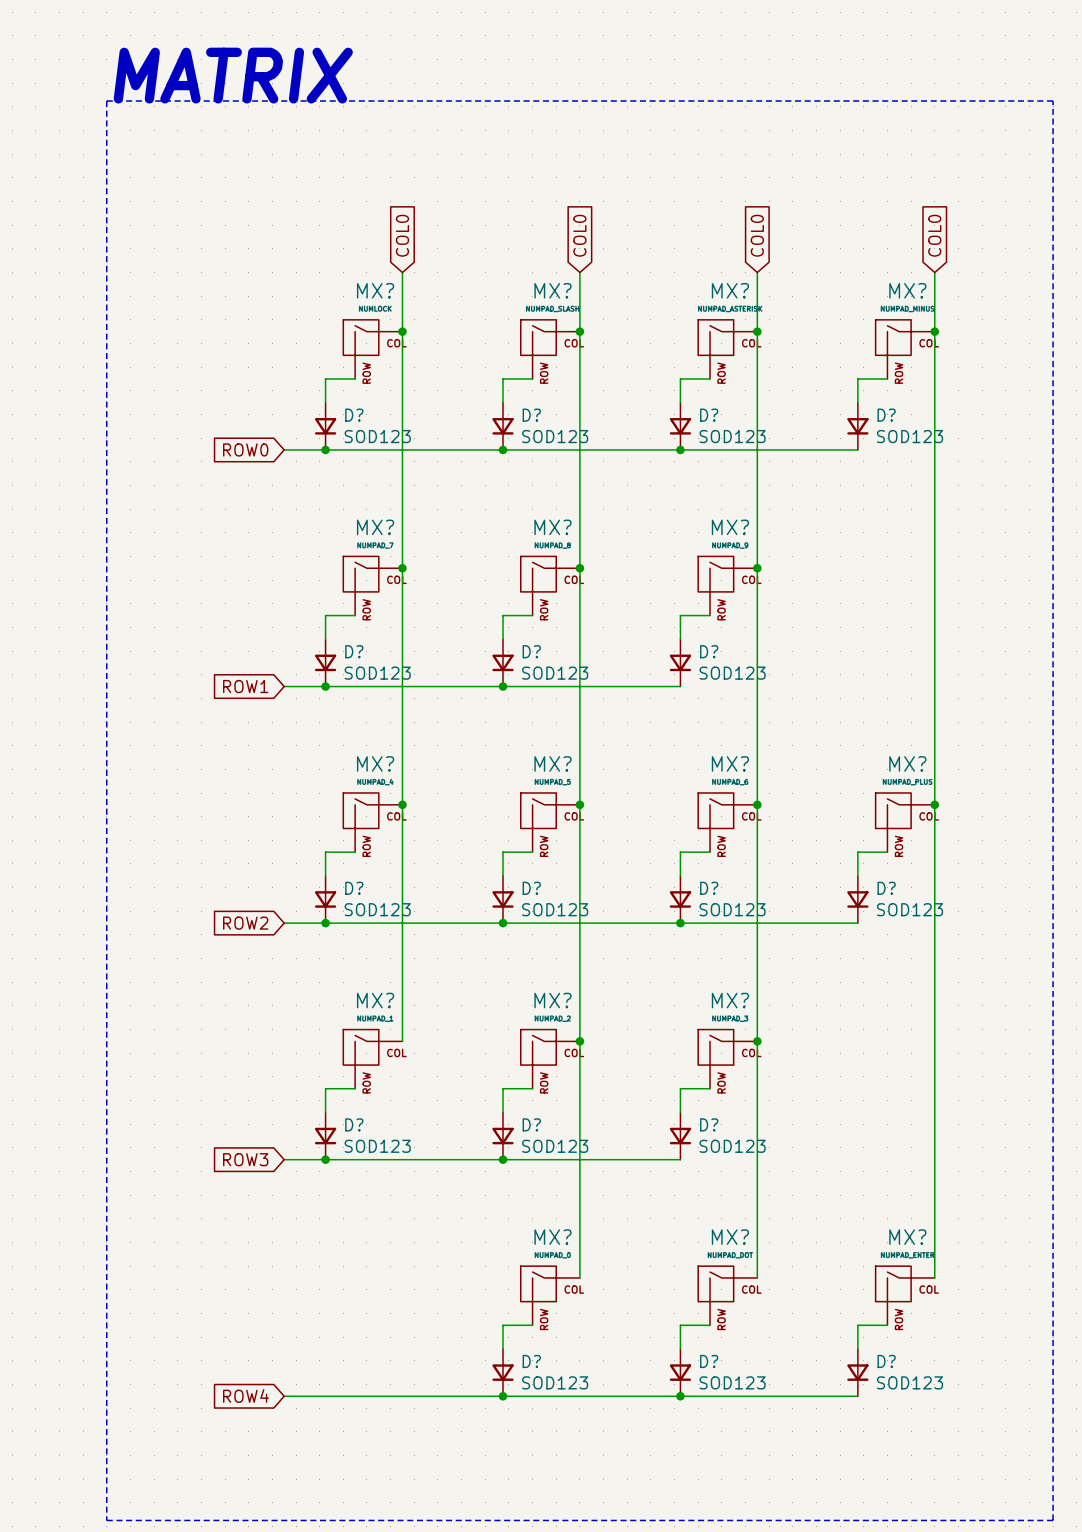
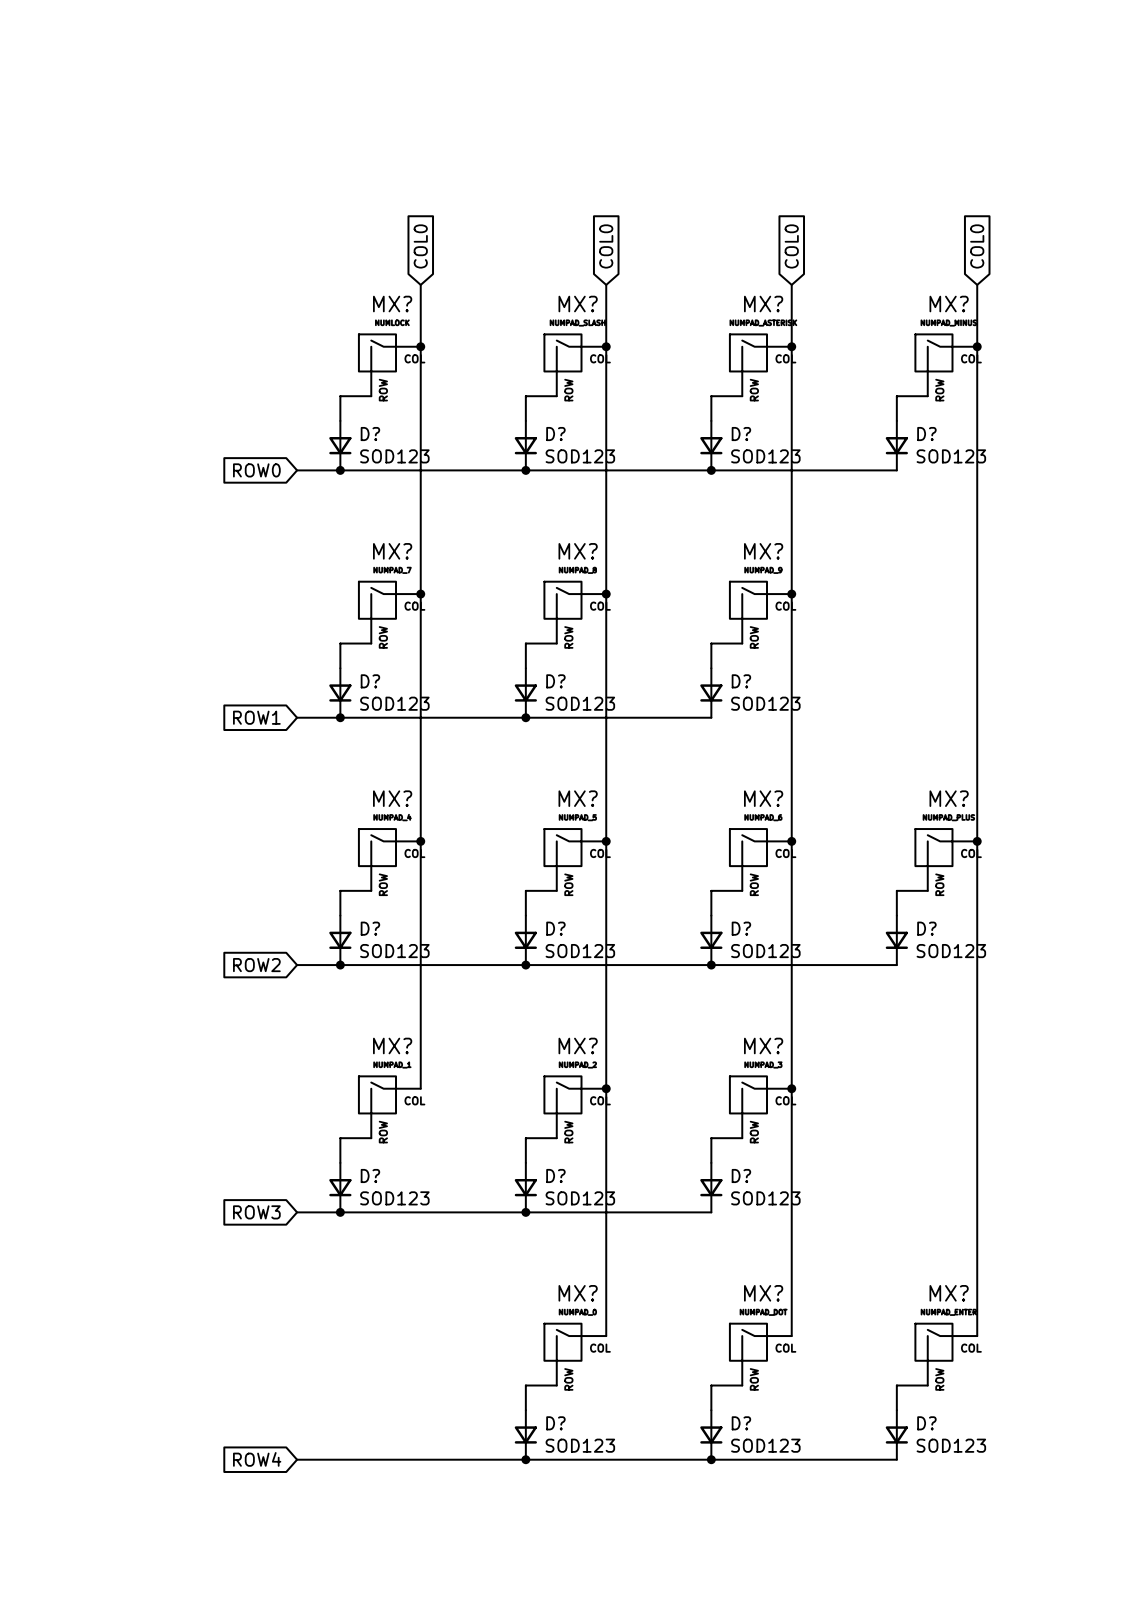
text: MATRIX (233, 75) -> none
line: (106, 101) (106, 1520) (1053, 1520) (1053, 101) (106, 101) -> none

